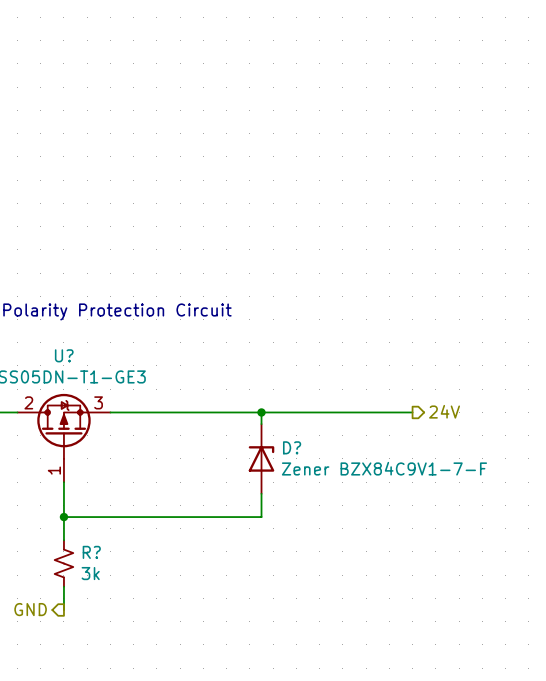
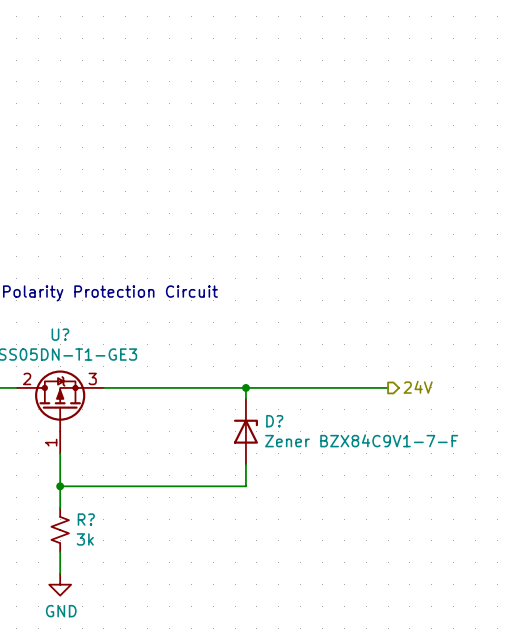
hierarchical label: GND (30, 609) -> none
power symbol: none -> GND (60, 584)

